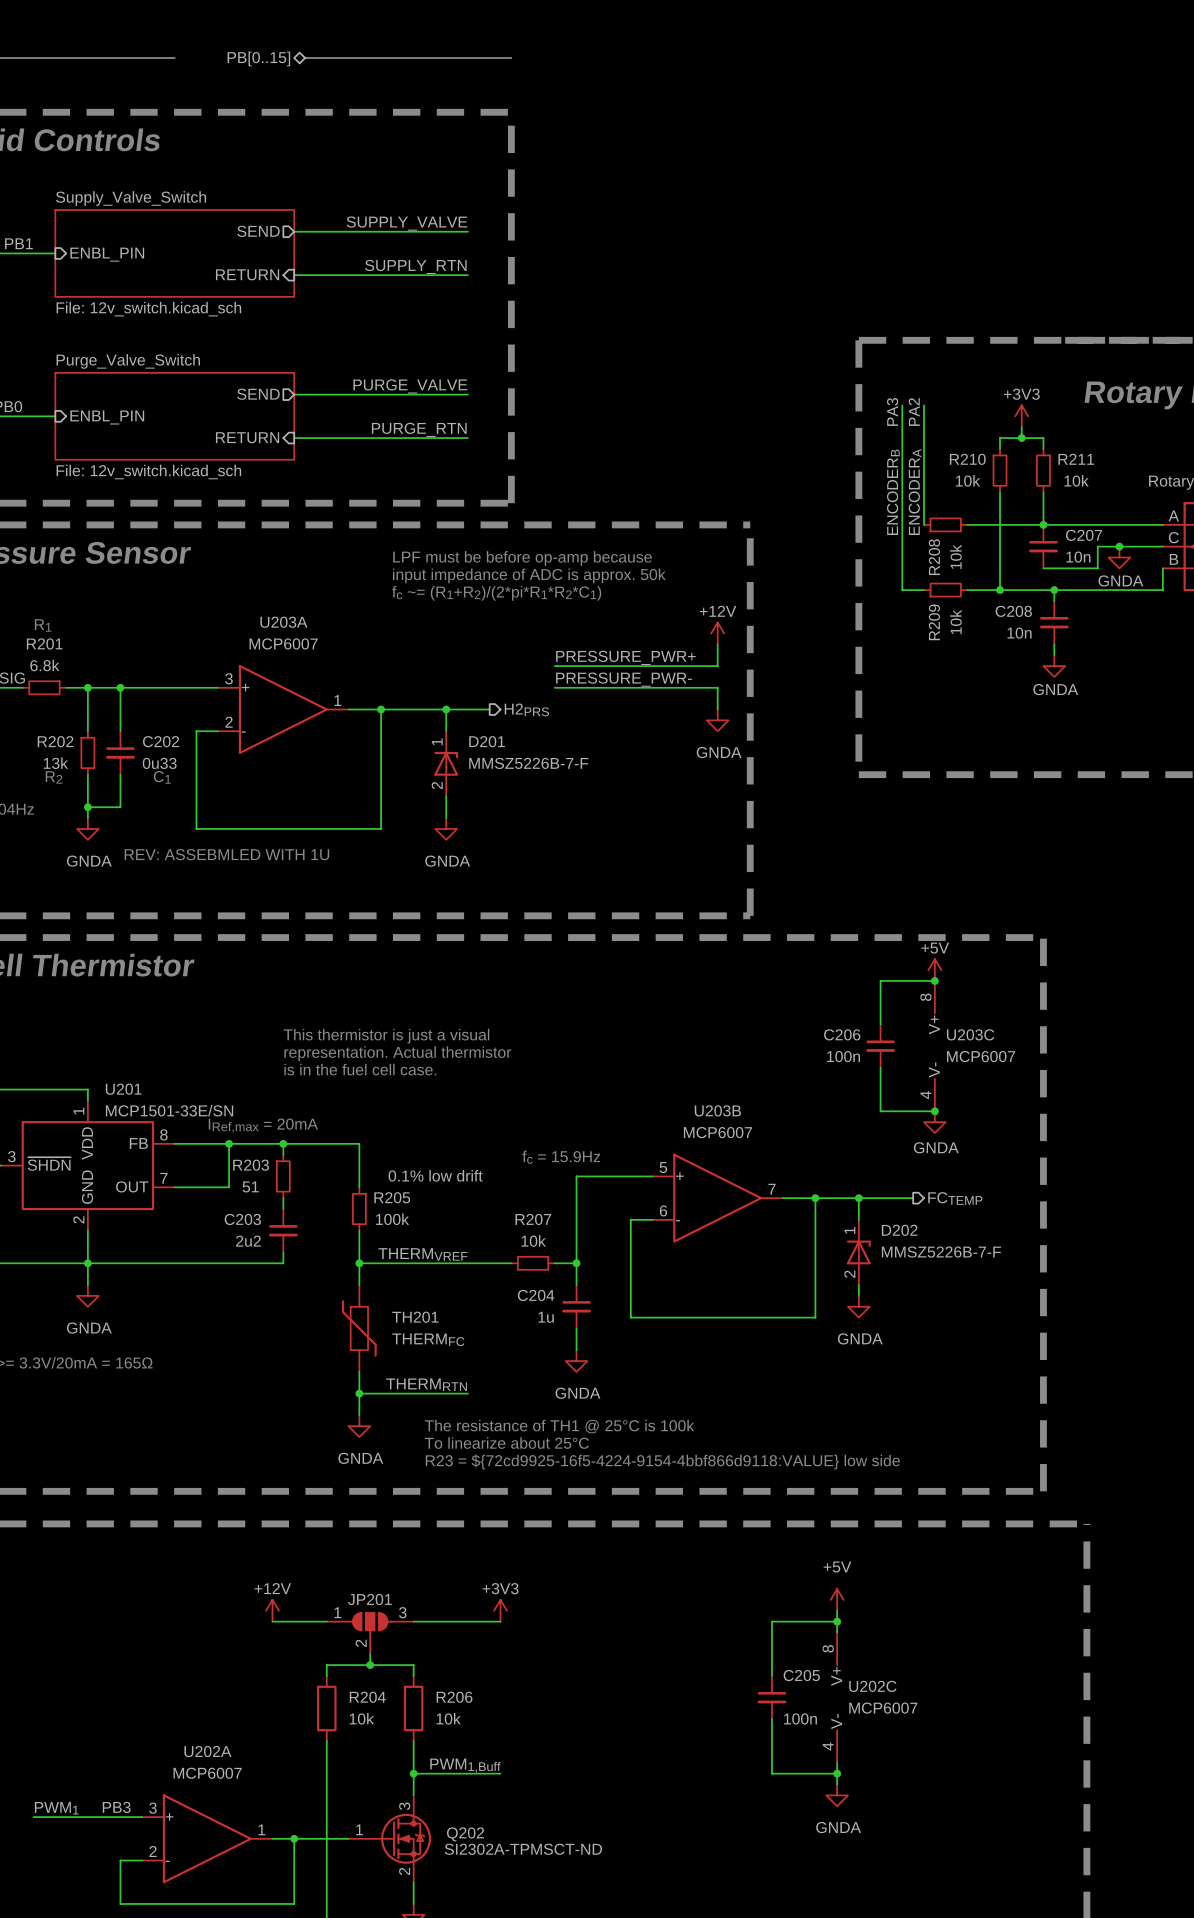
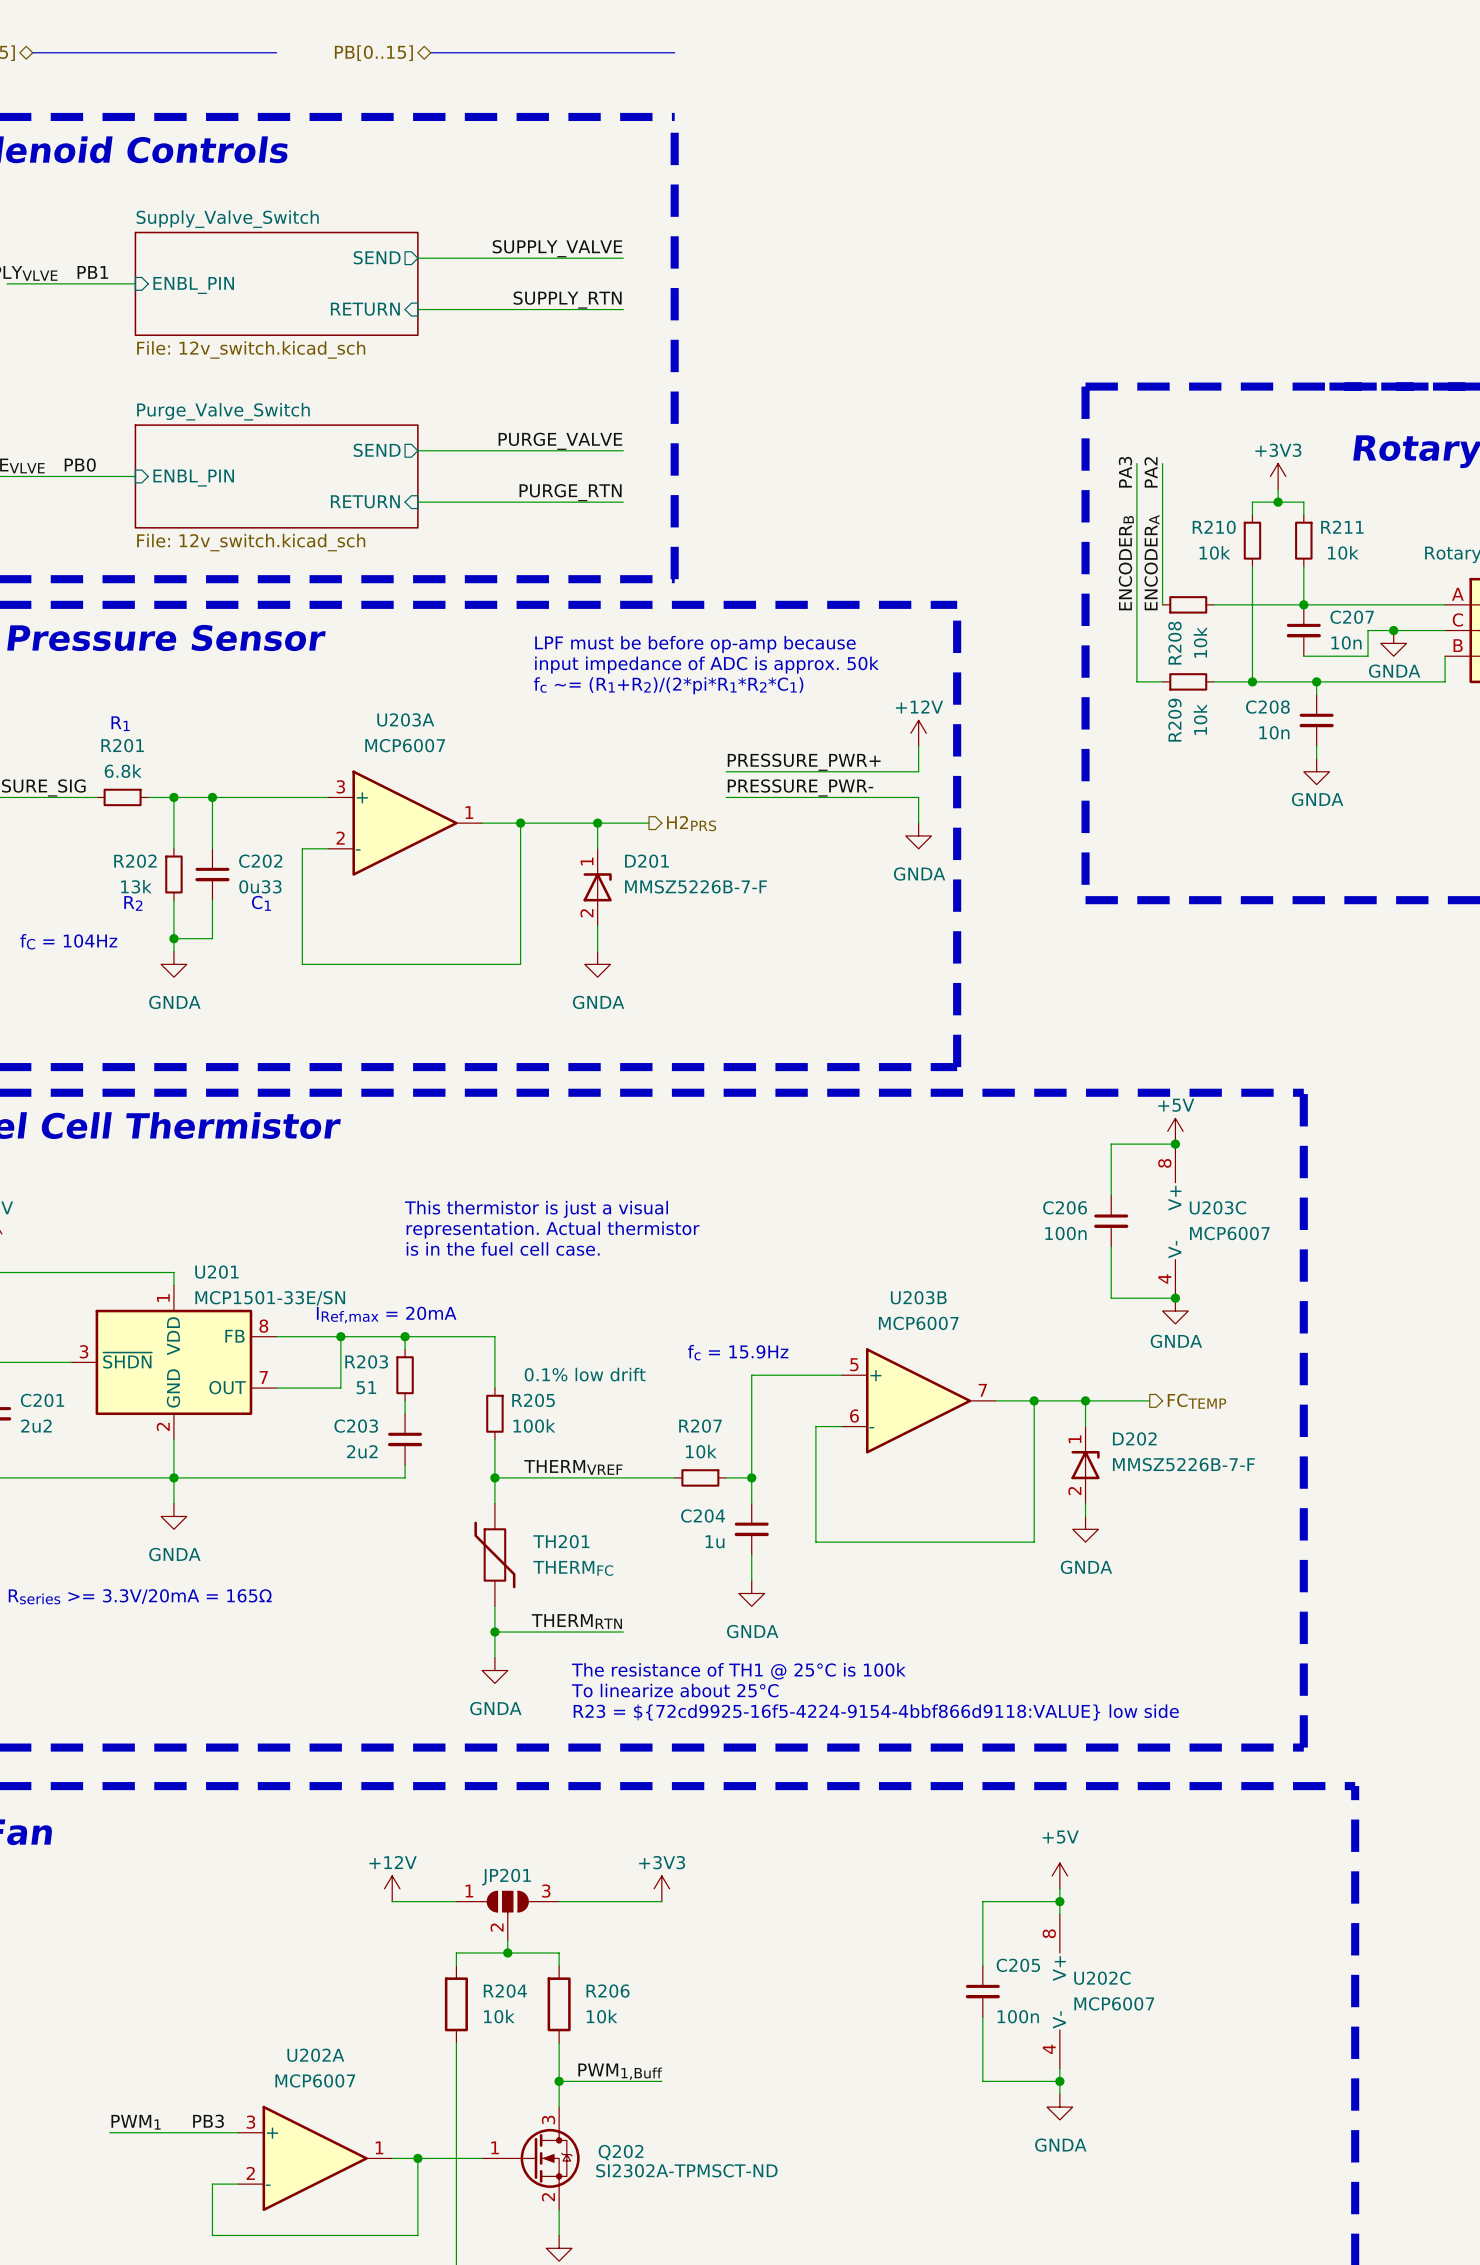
text: REV: ASSEBMLED WITH 1U (226, 854) -> none

